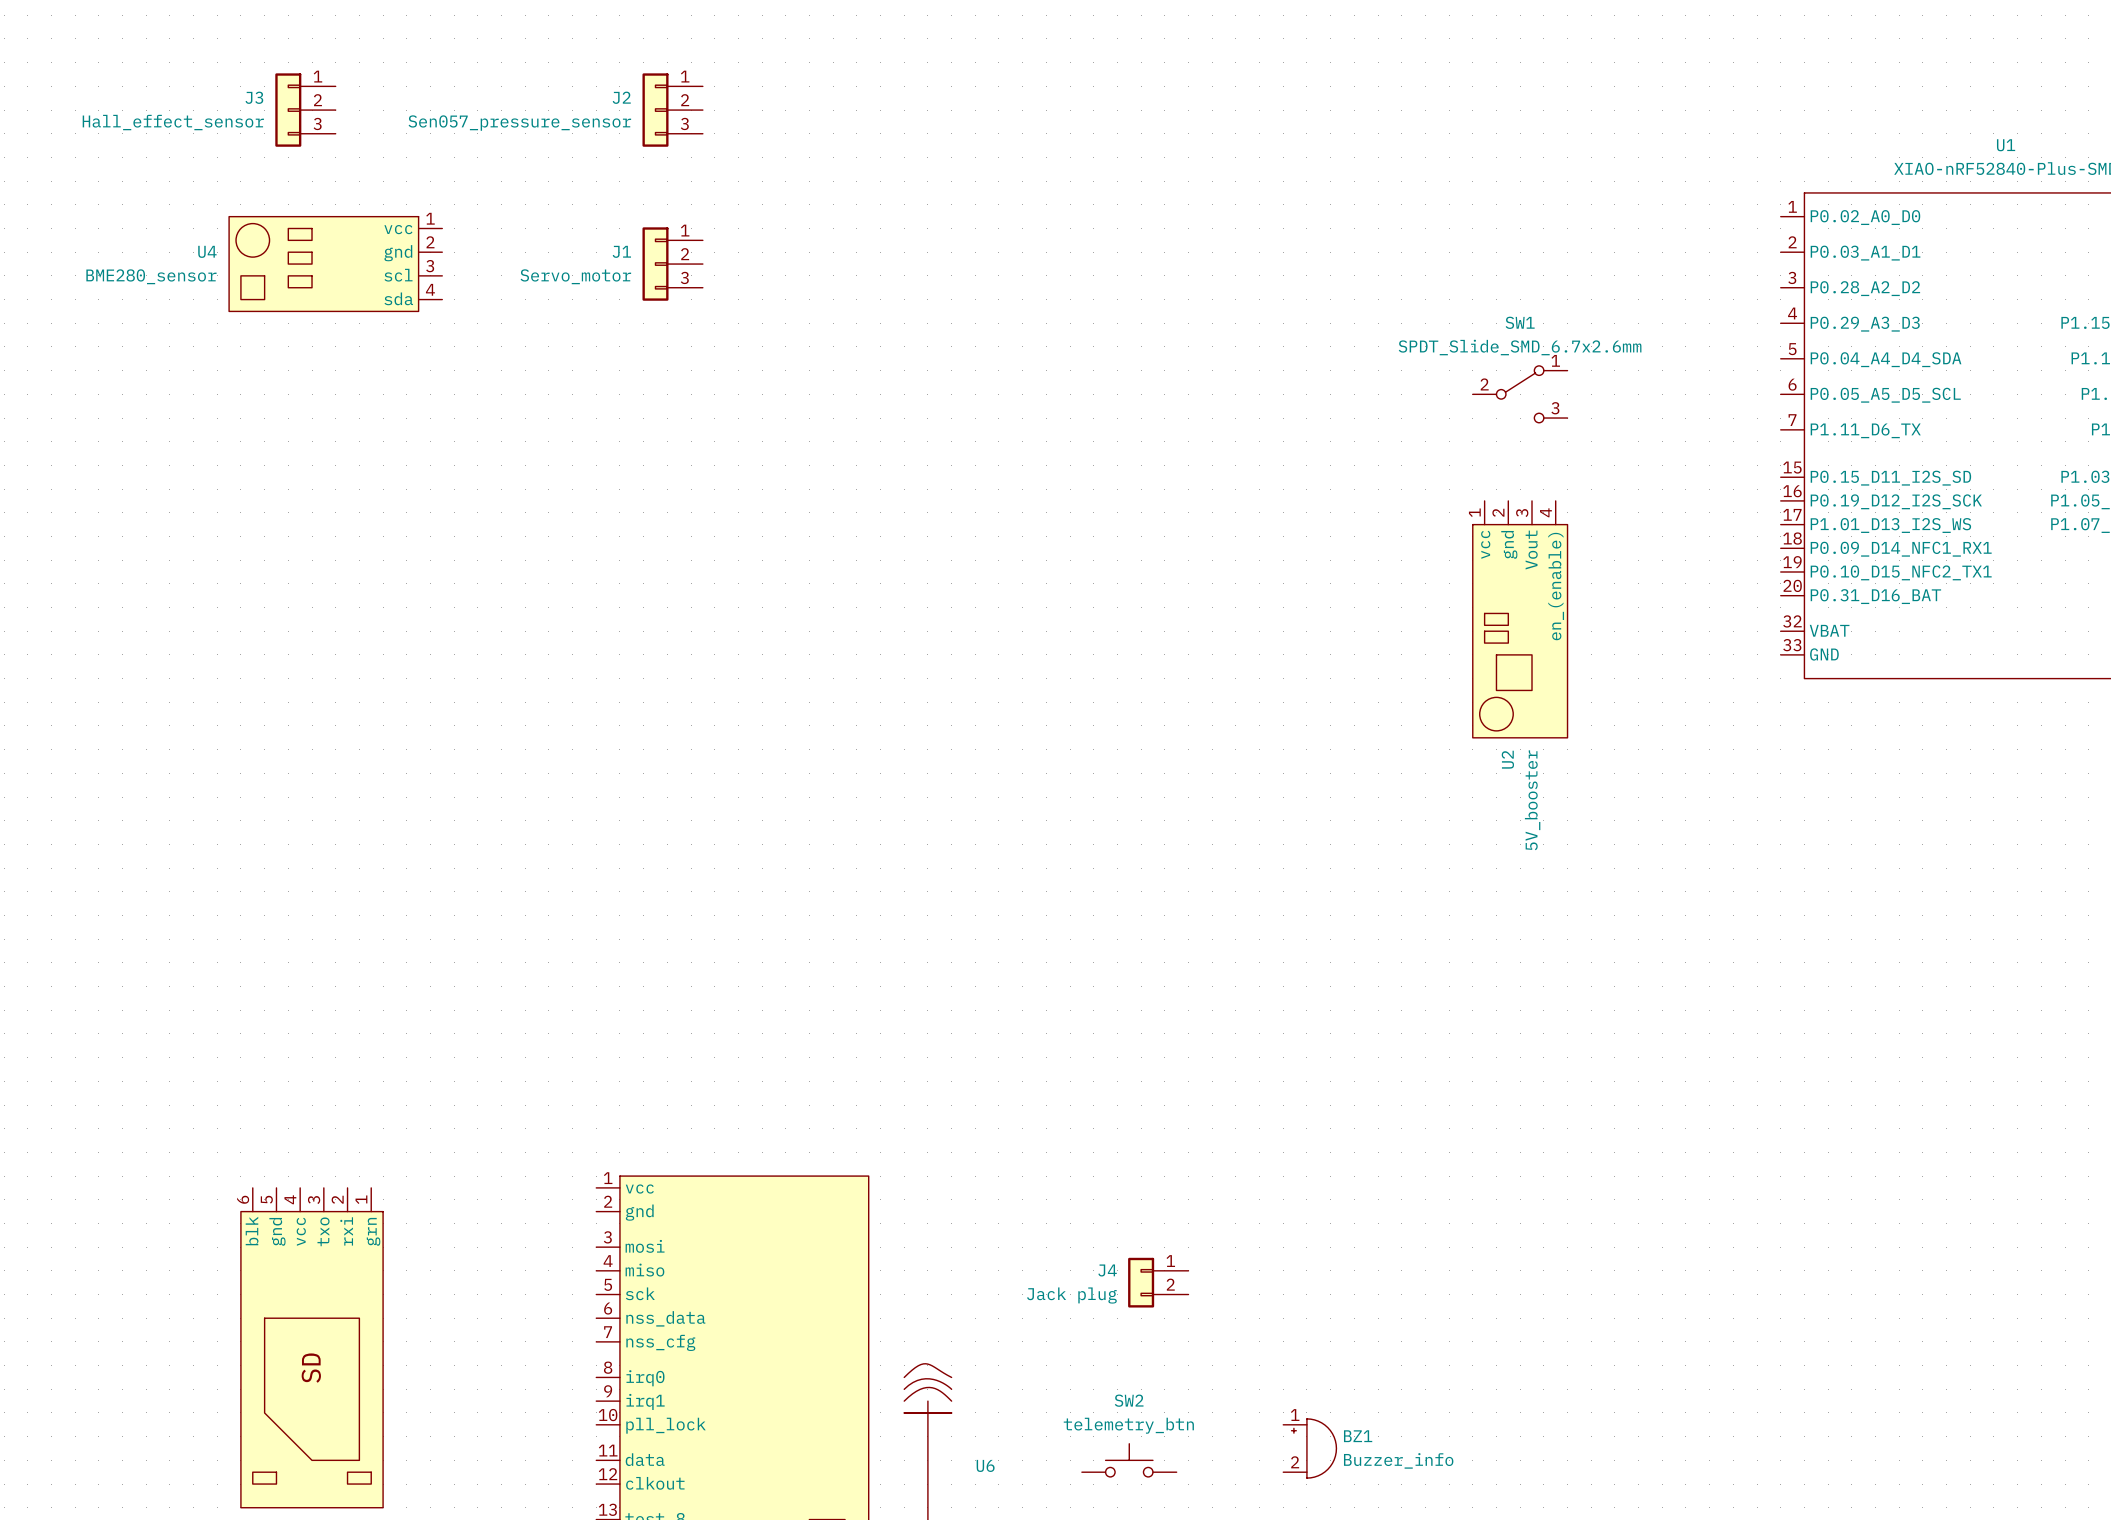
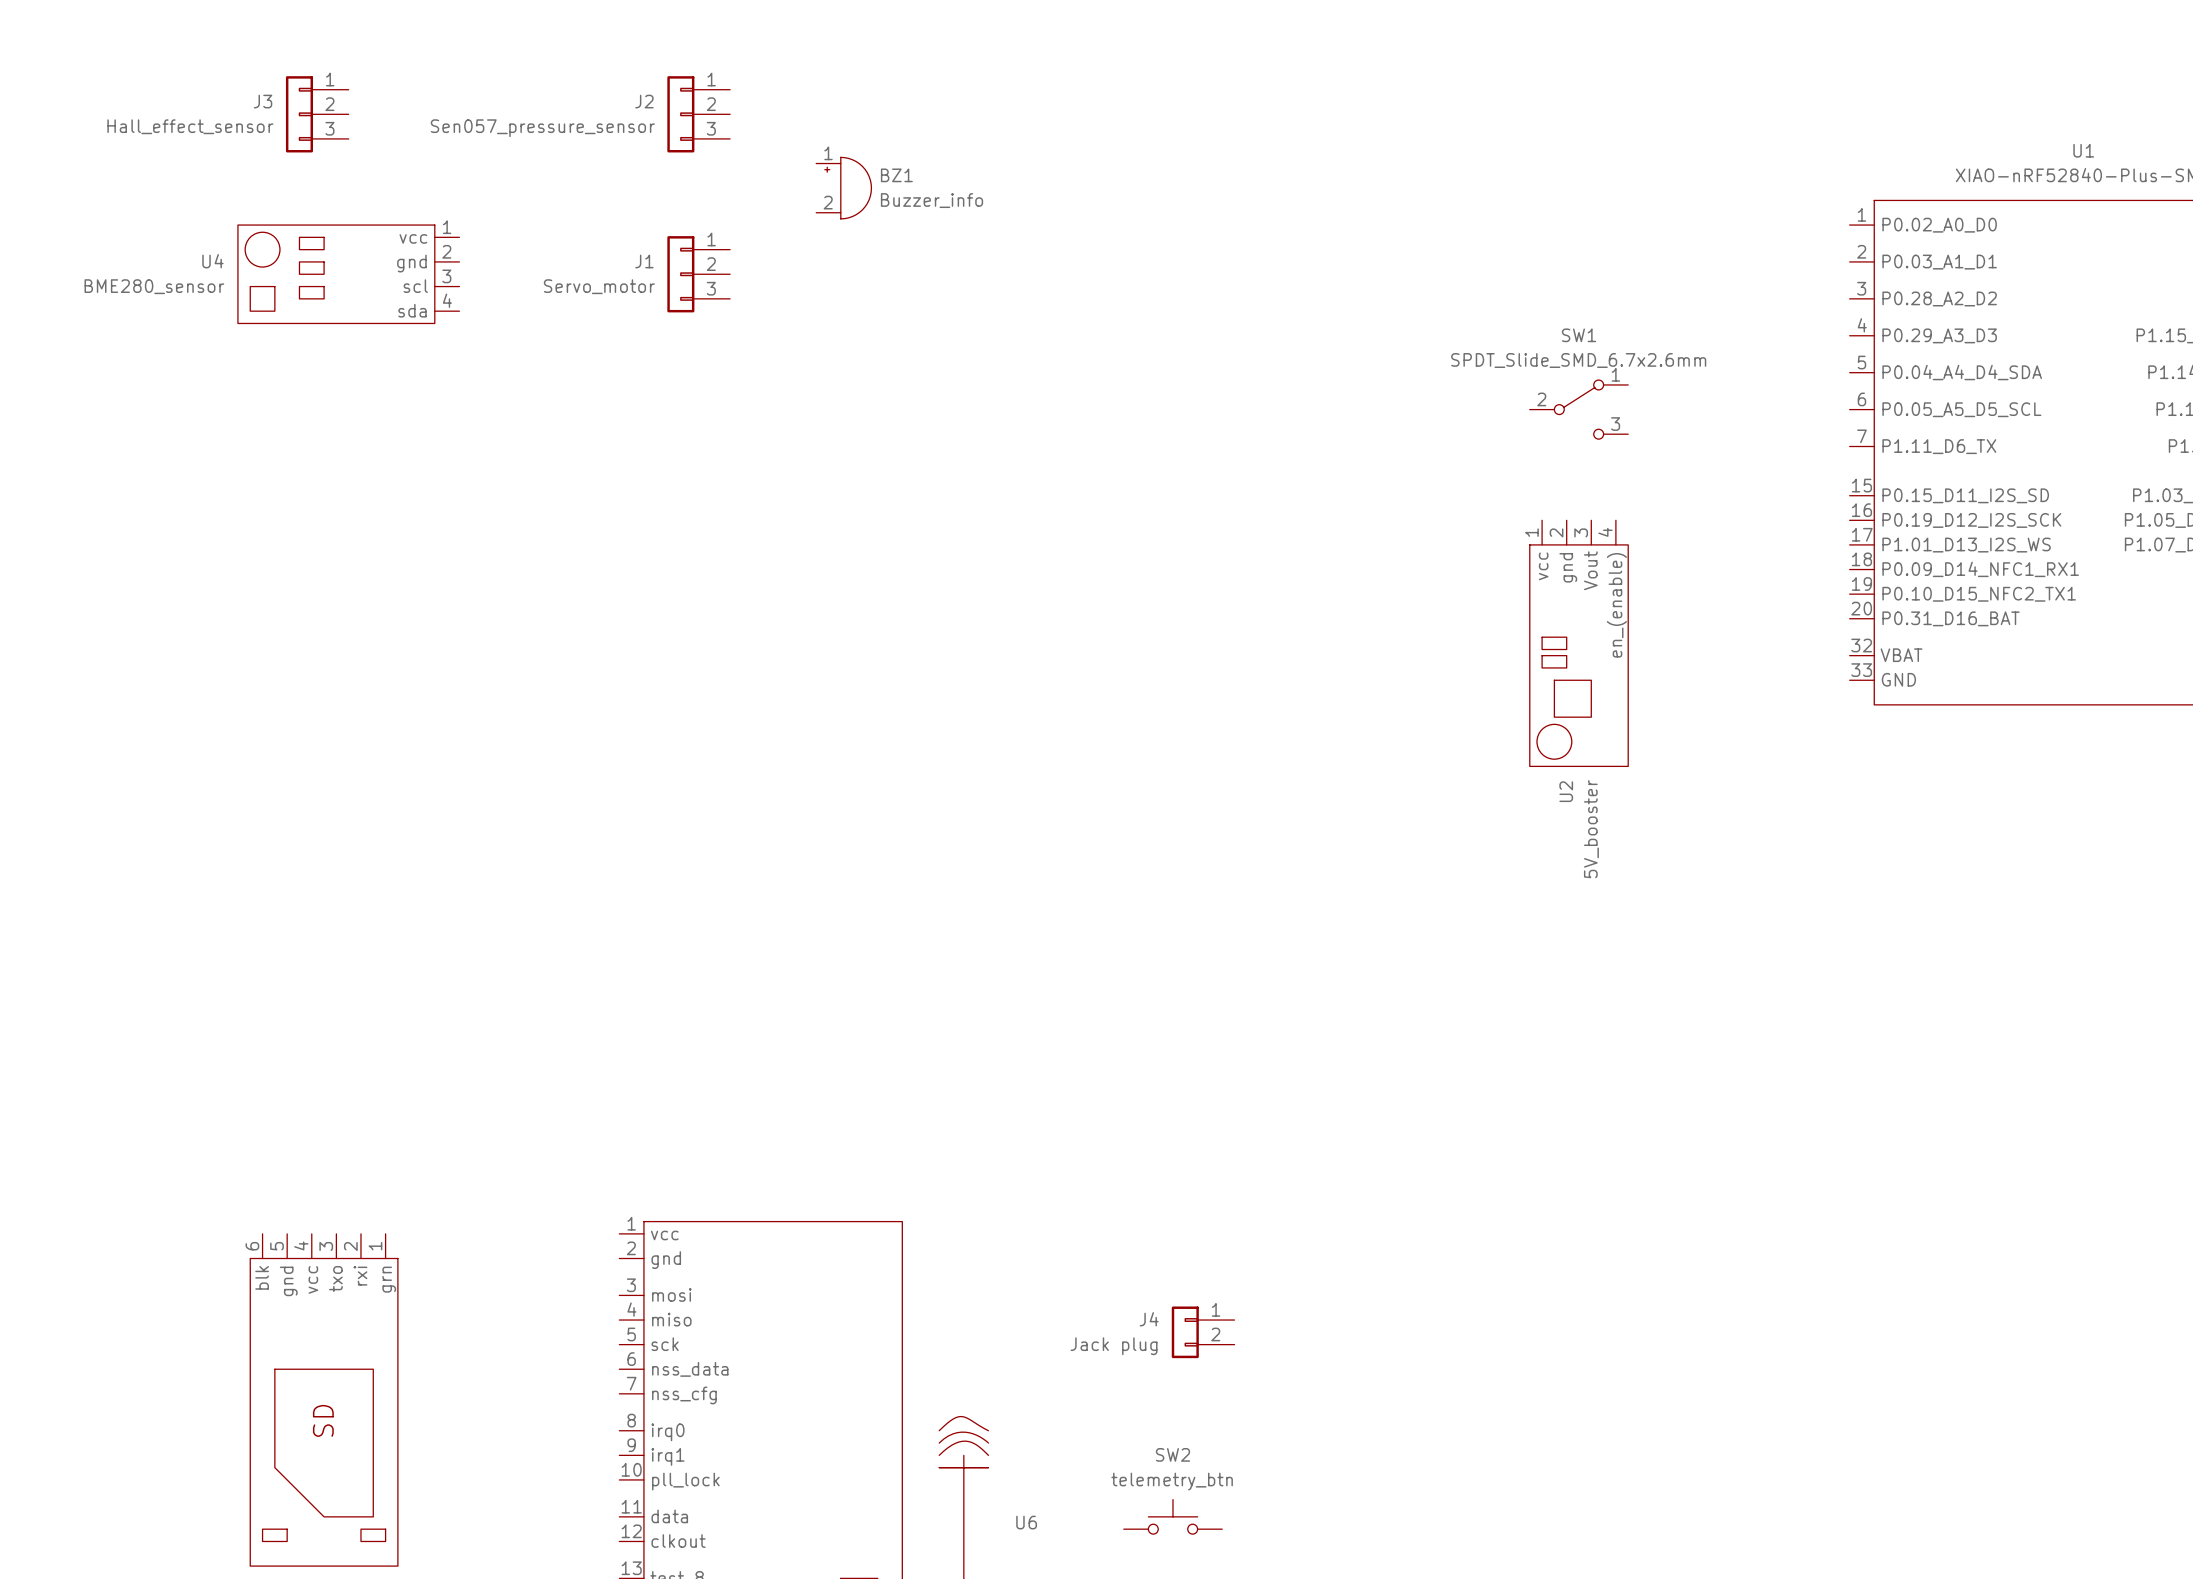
BZ1 position: (1309, 1448) -> (843, 188)

